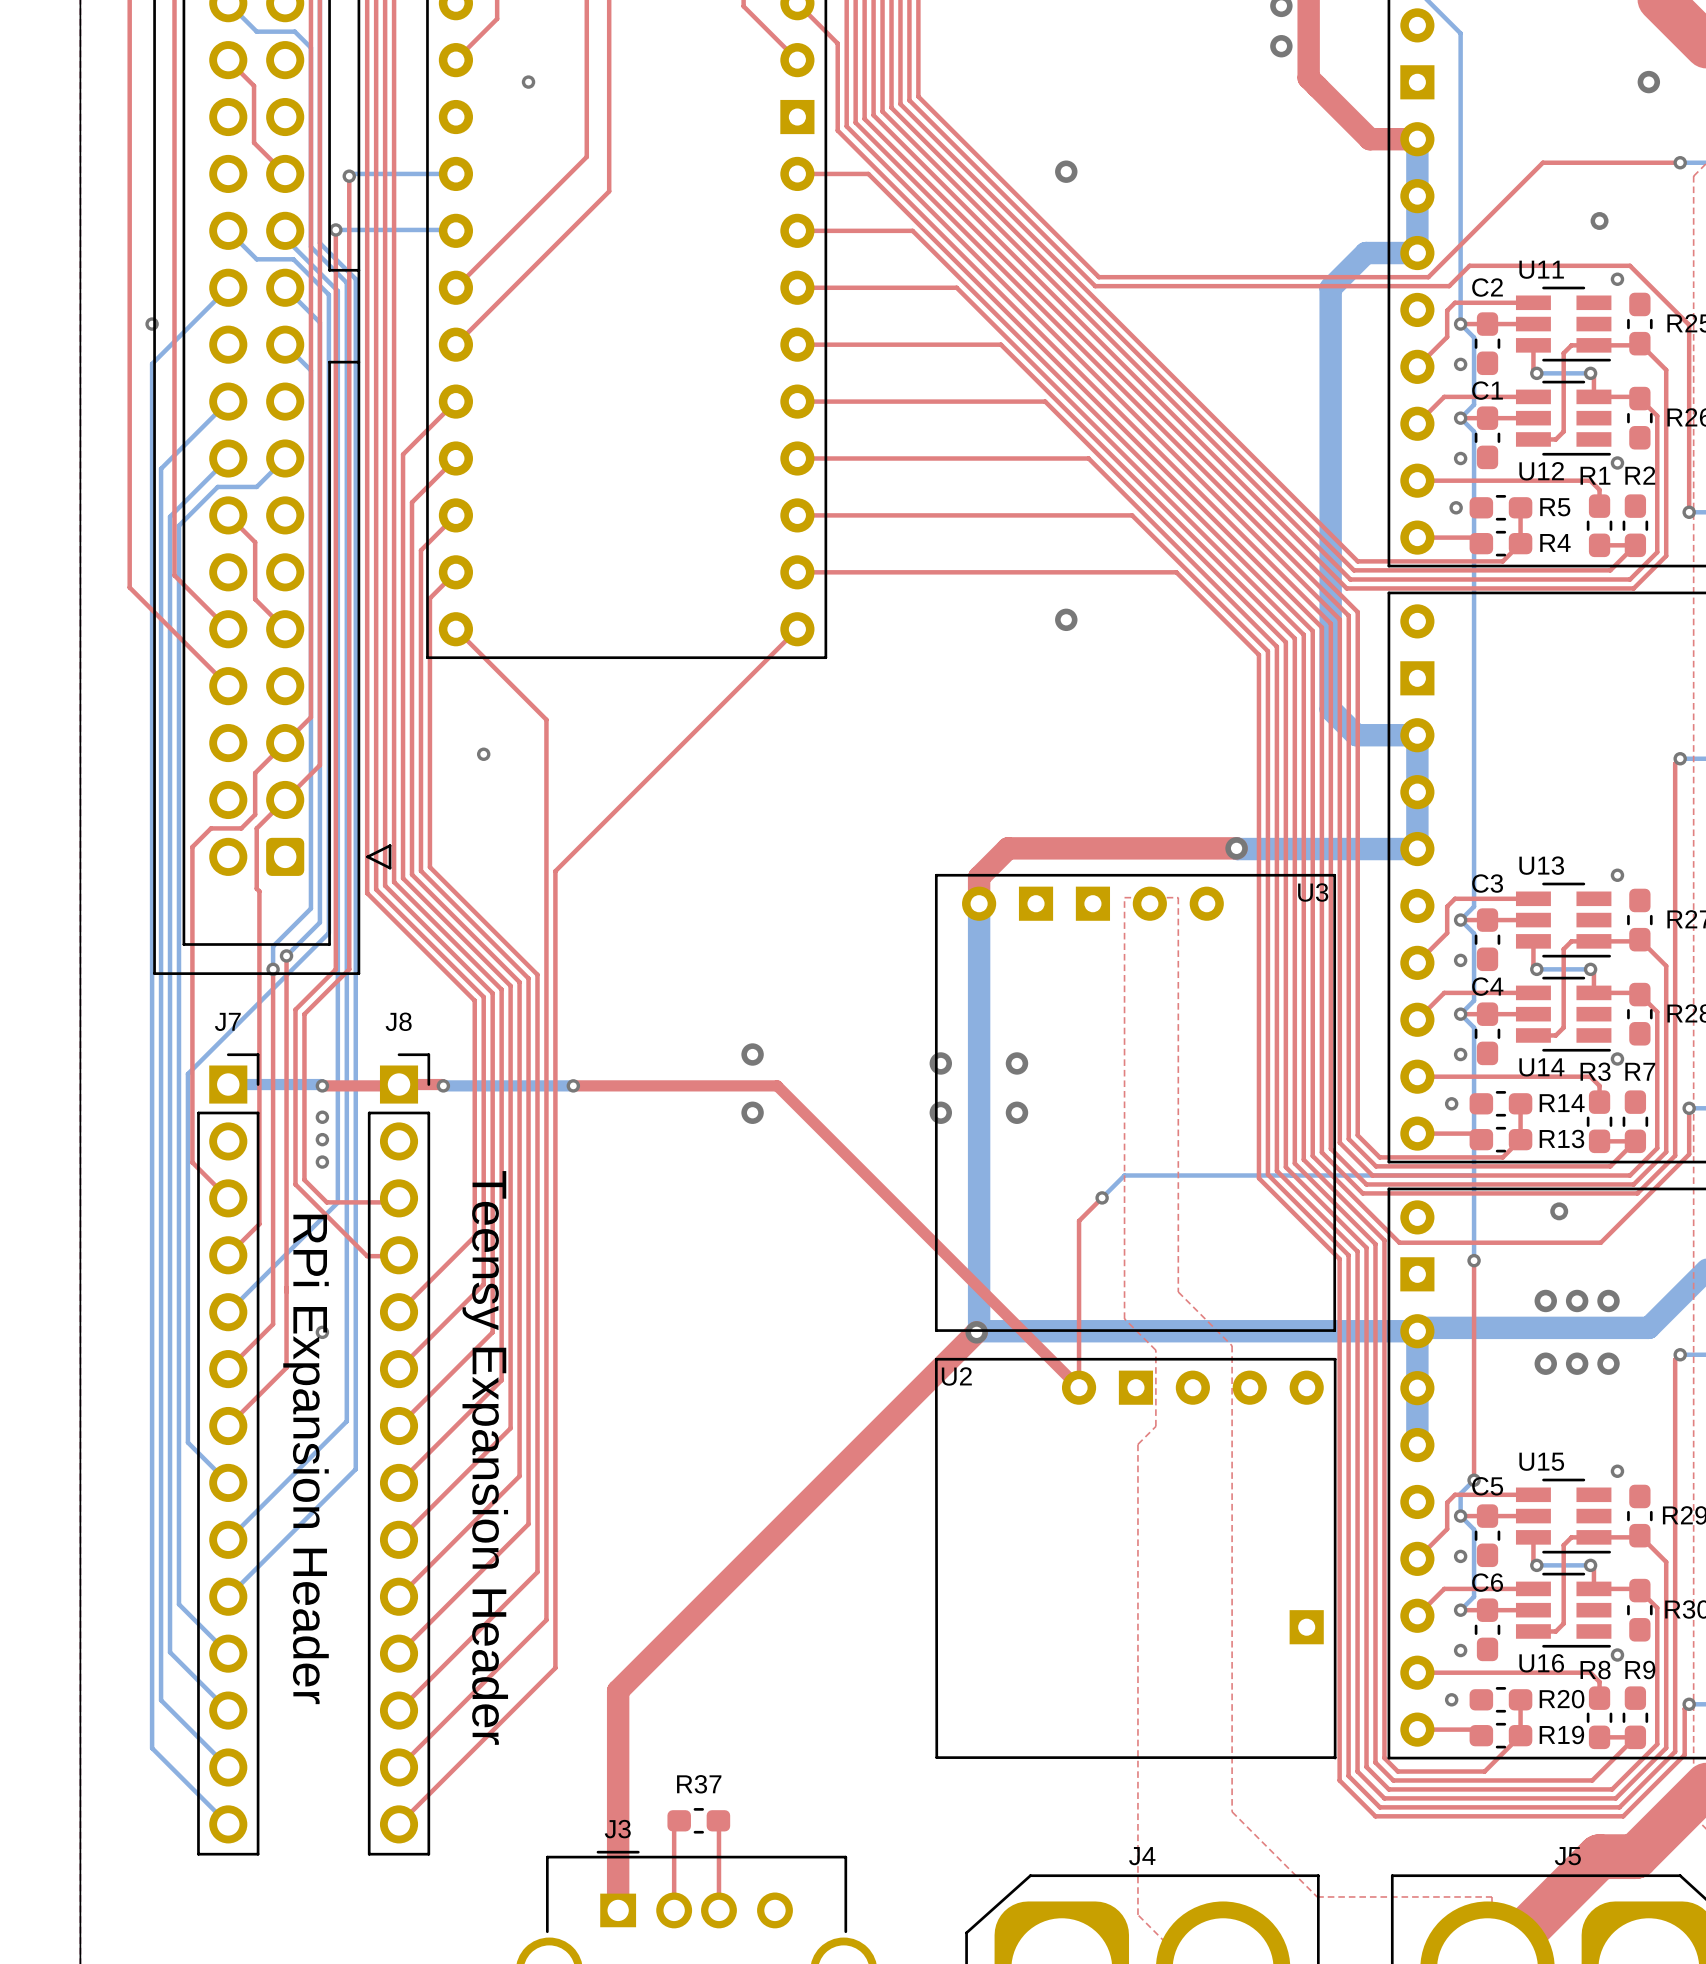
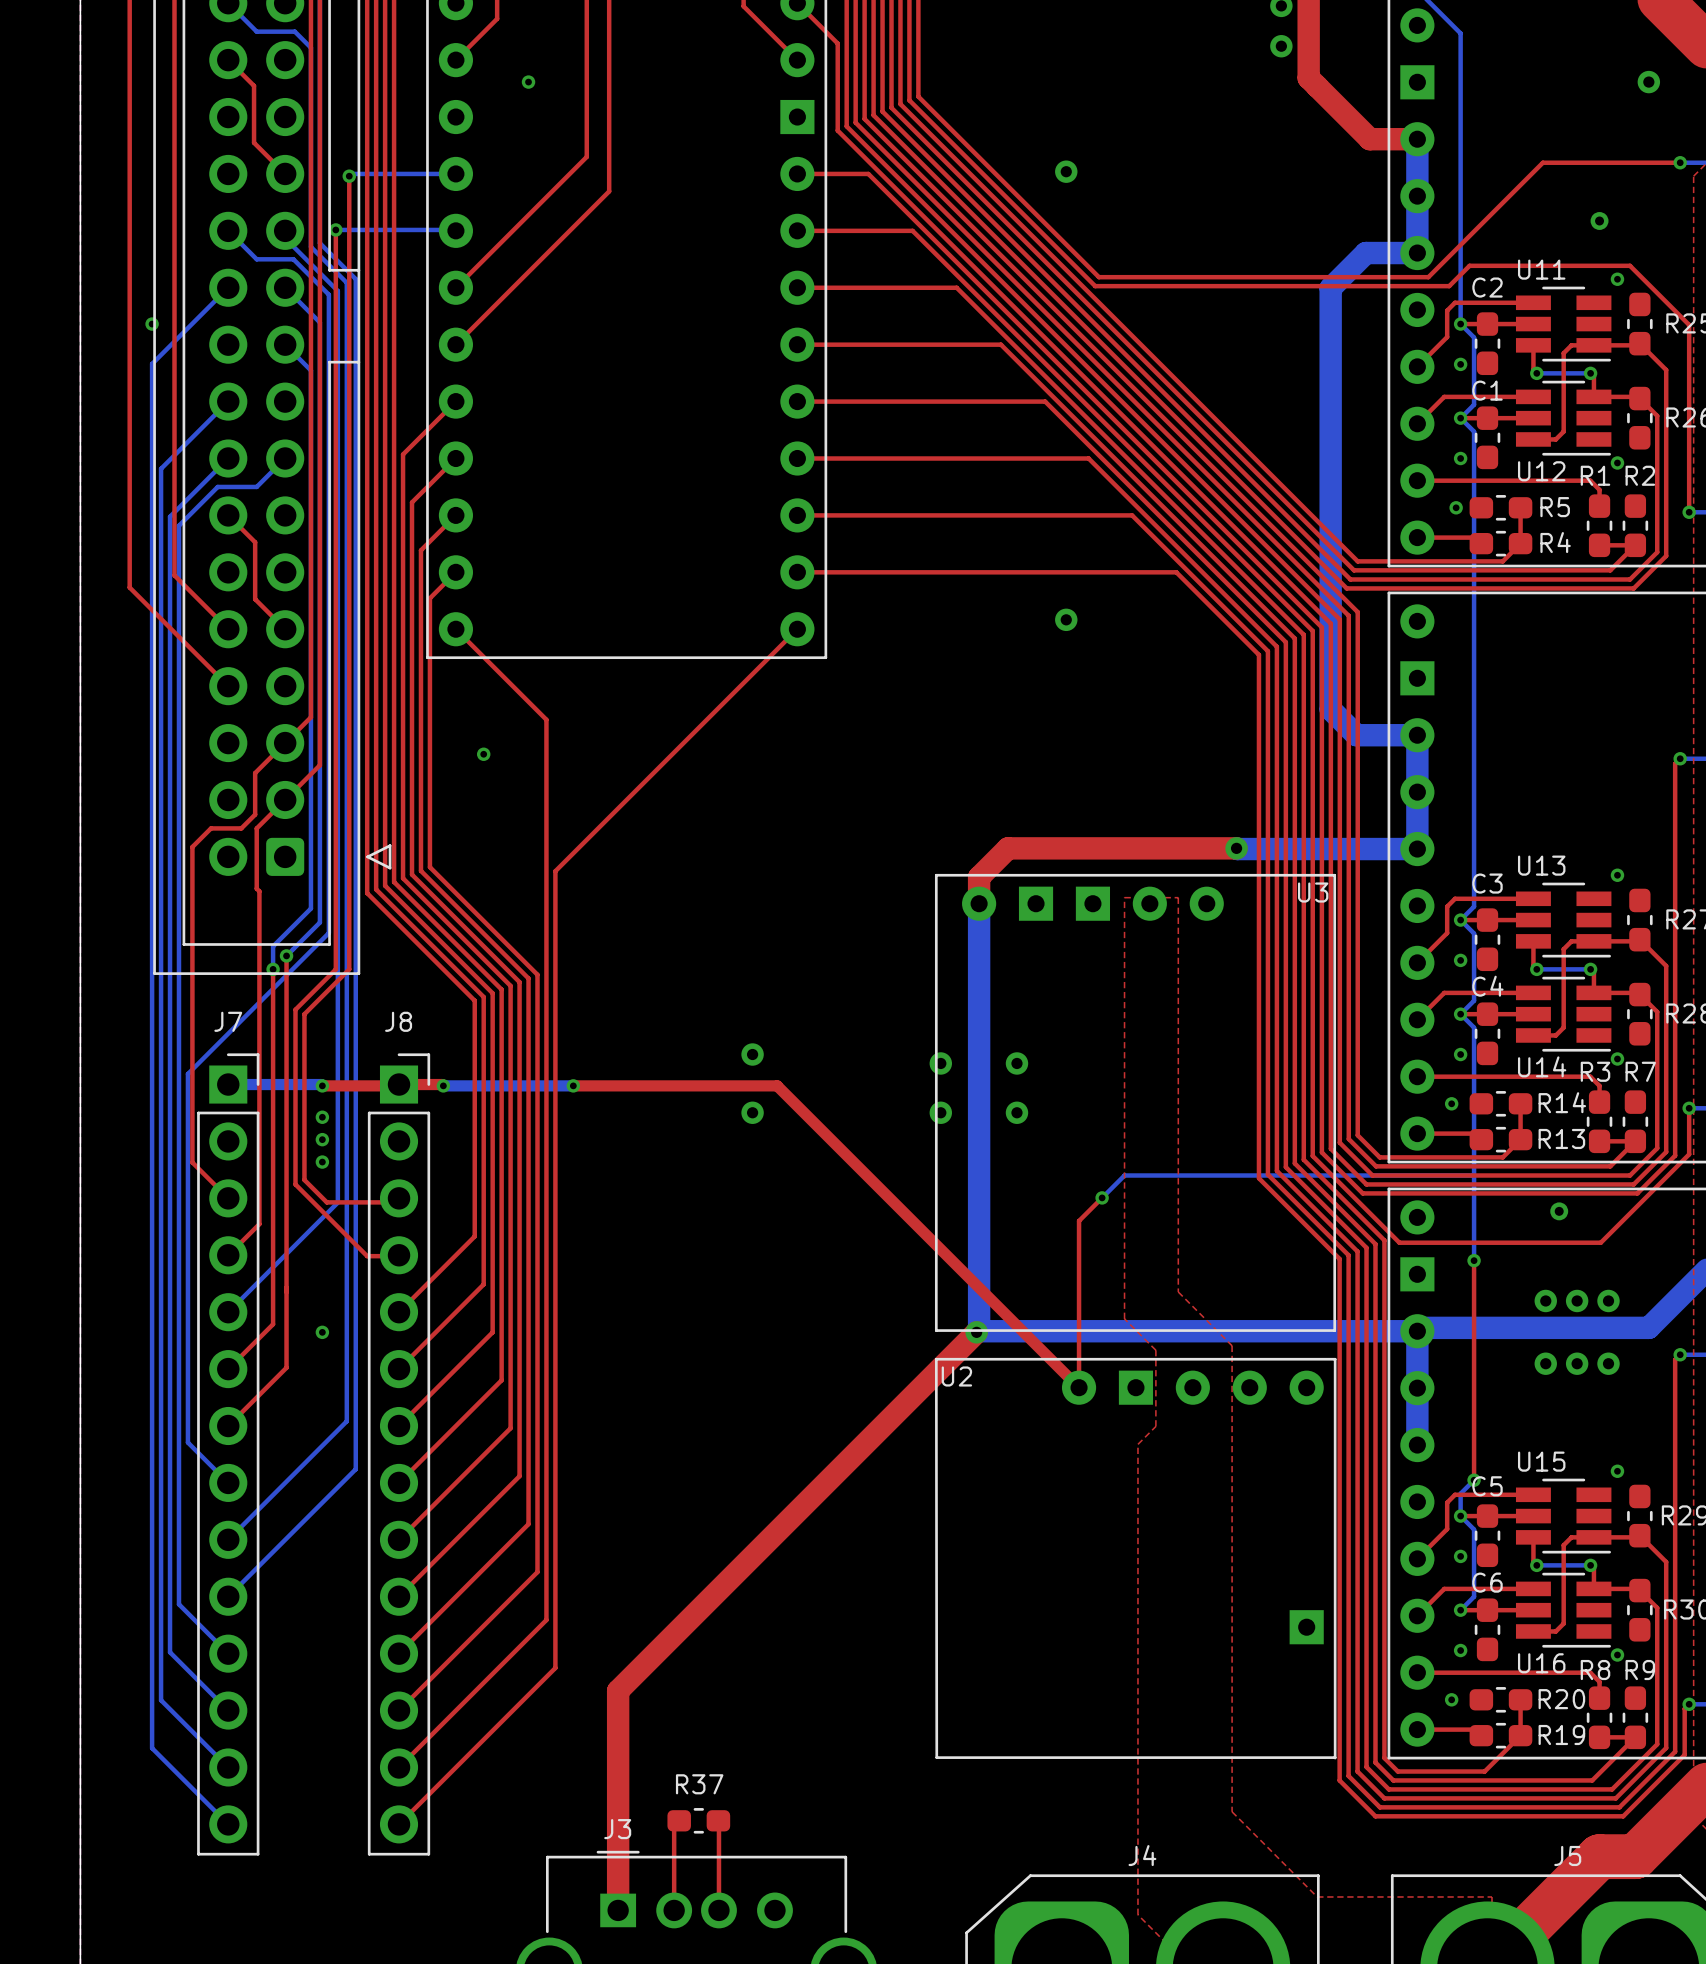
text: Teensy Expansion Header (485, 1457) -> none
text: RPi Expansion Header (306, 1459) -> none

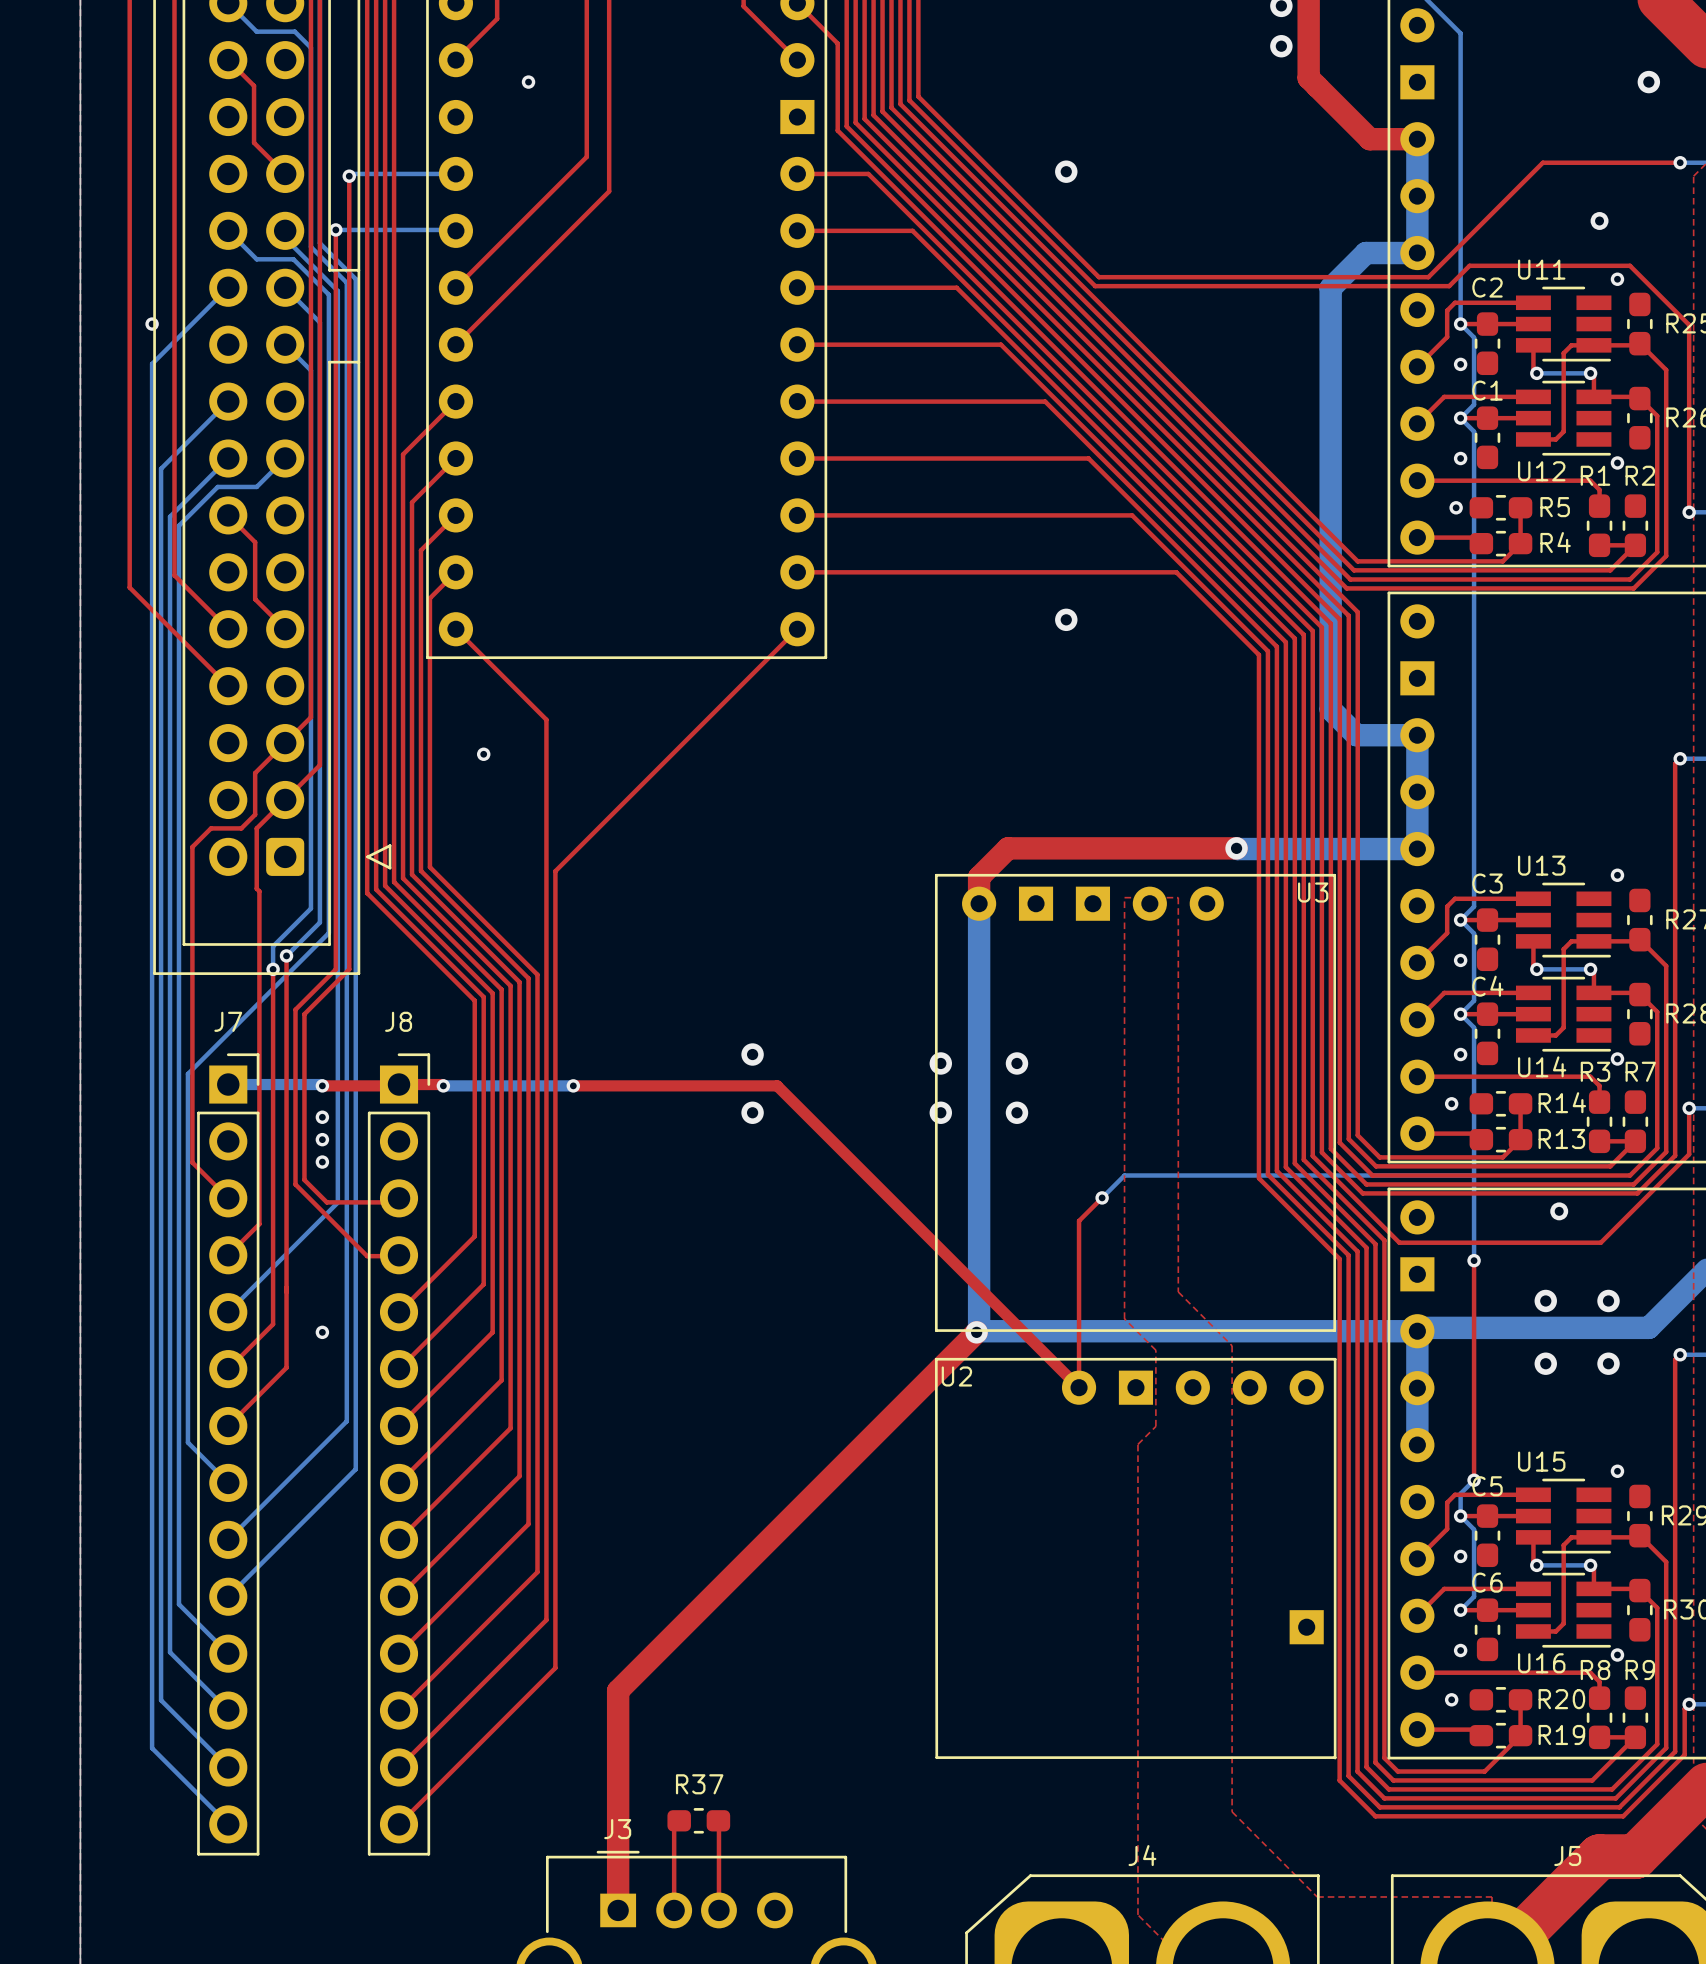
via: (1577, 1300) -> none
via: (1577, 1363) -> none

